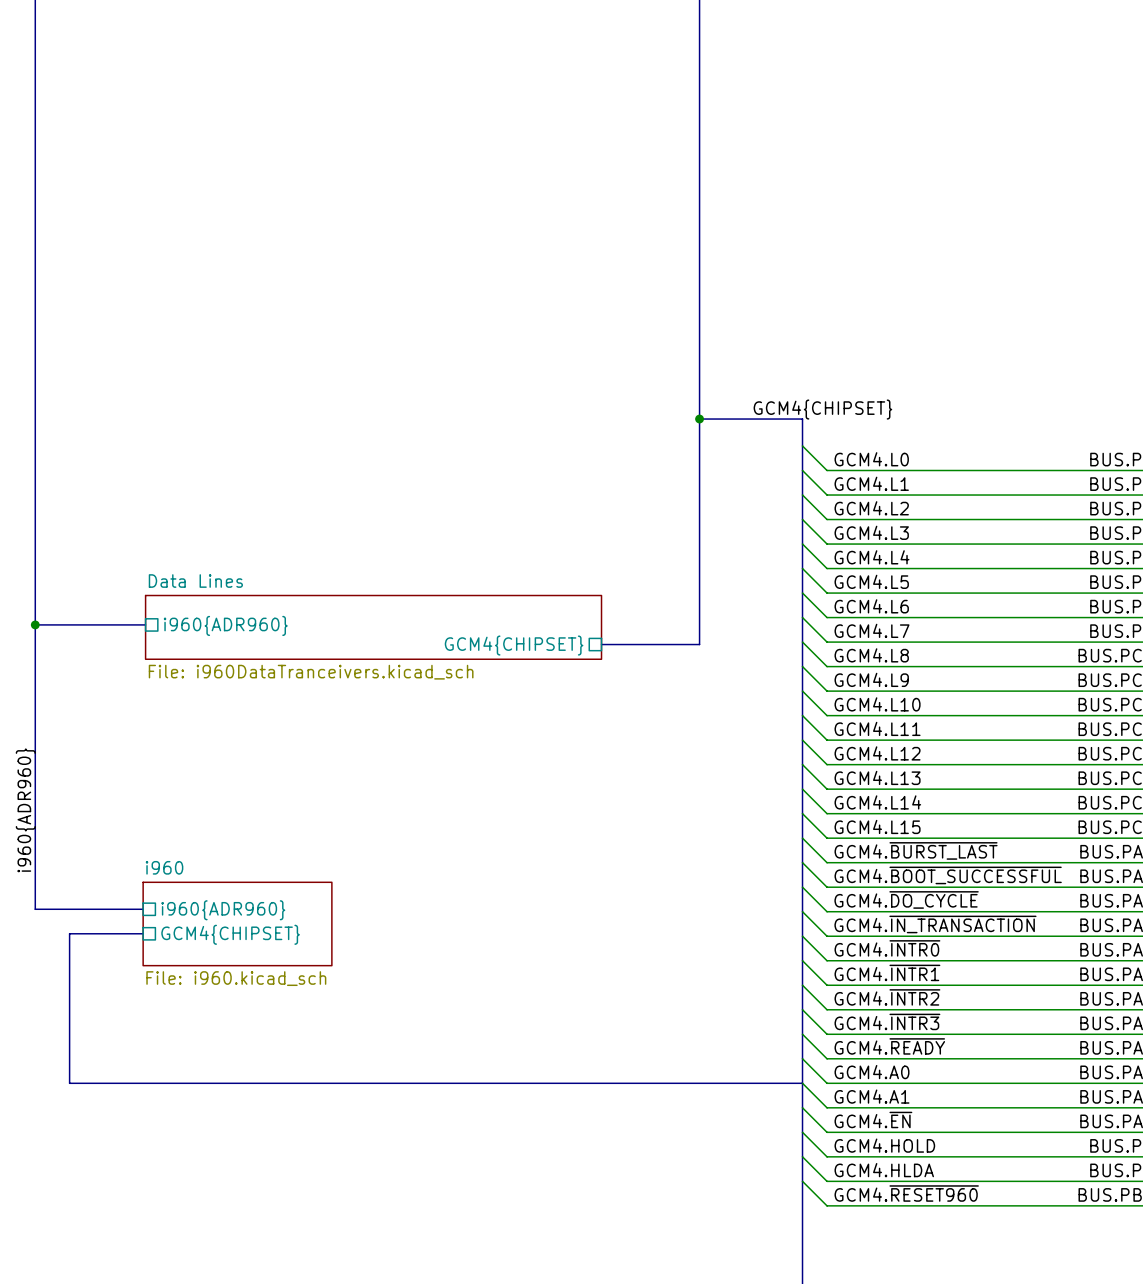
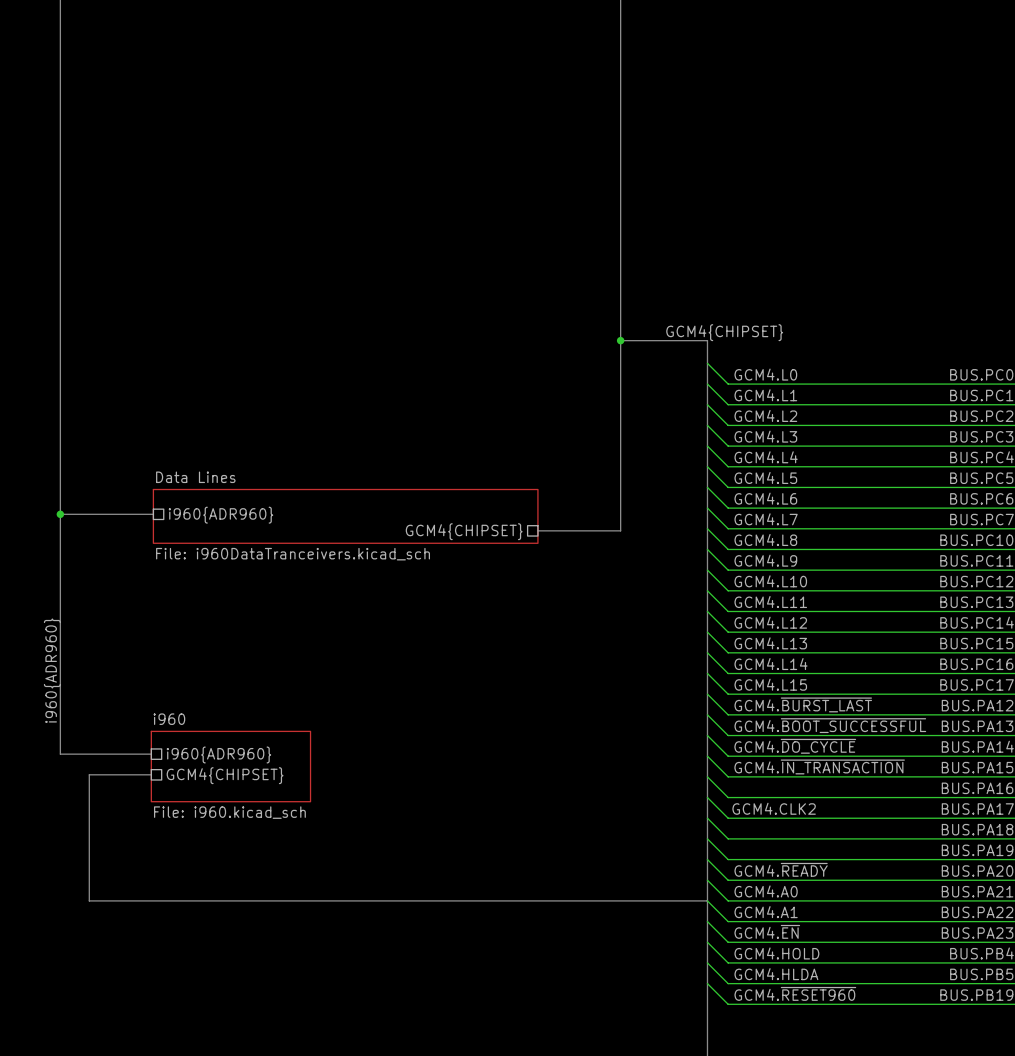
label: GCM4.~{INTR0} (887, 948) -> none
label: GCM4.~{INTR1} (887, 972) -> GCM4.CLK2 (774, 808)
label: GCM4.~{INTR2} (887, 997) -> none
label: GCM4.~{INTR3} (887, 1021) -> none

